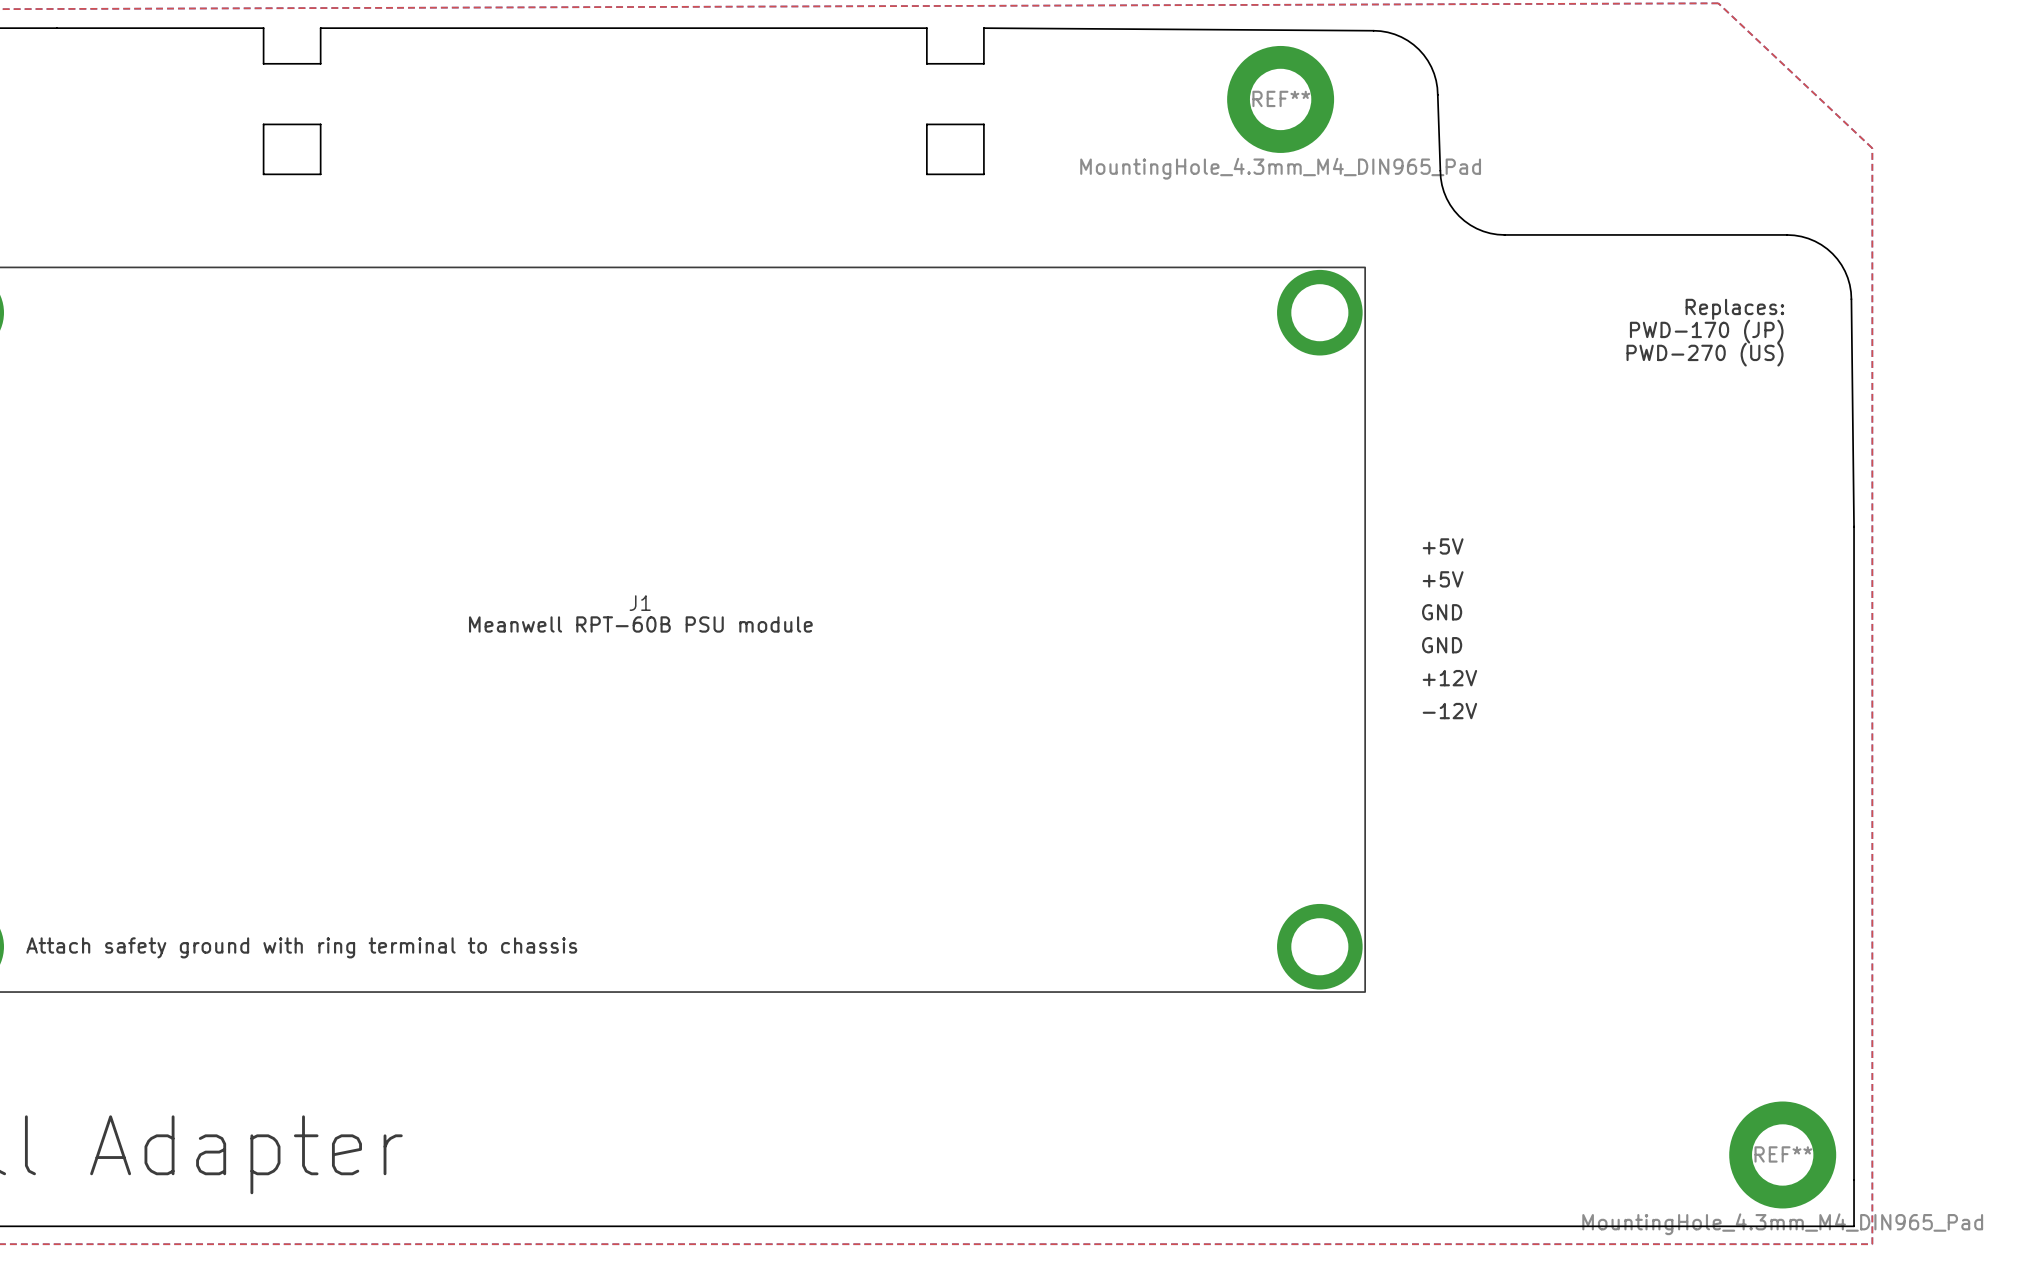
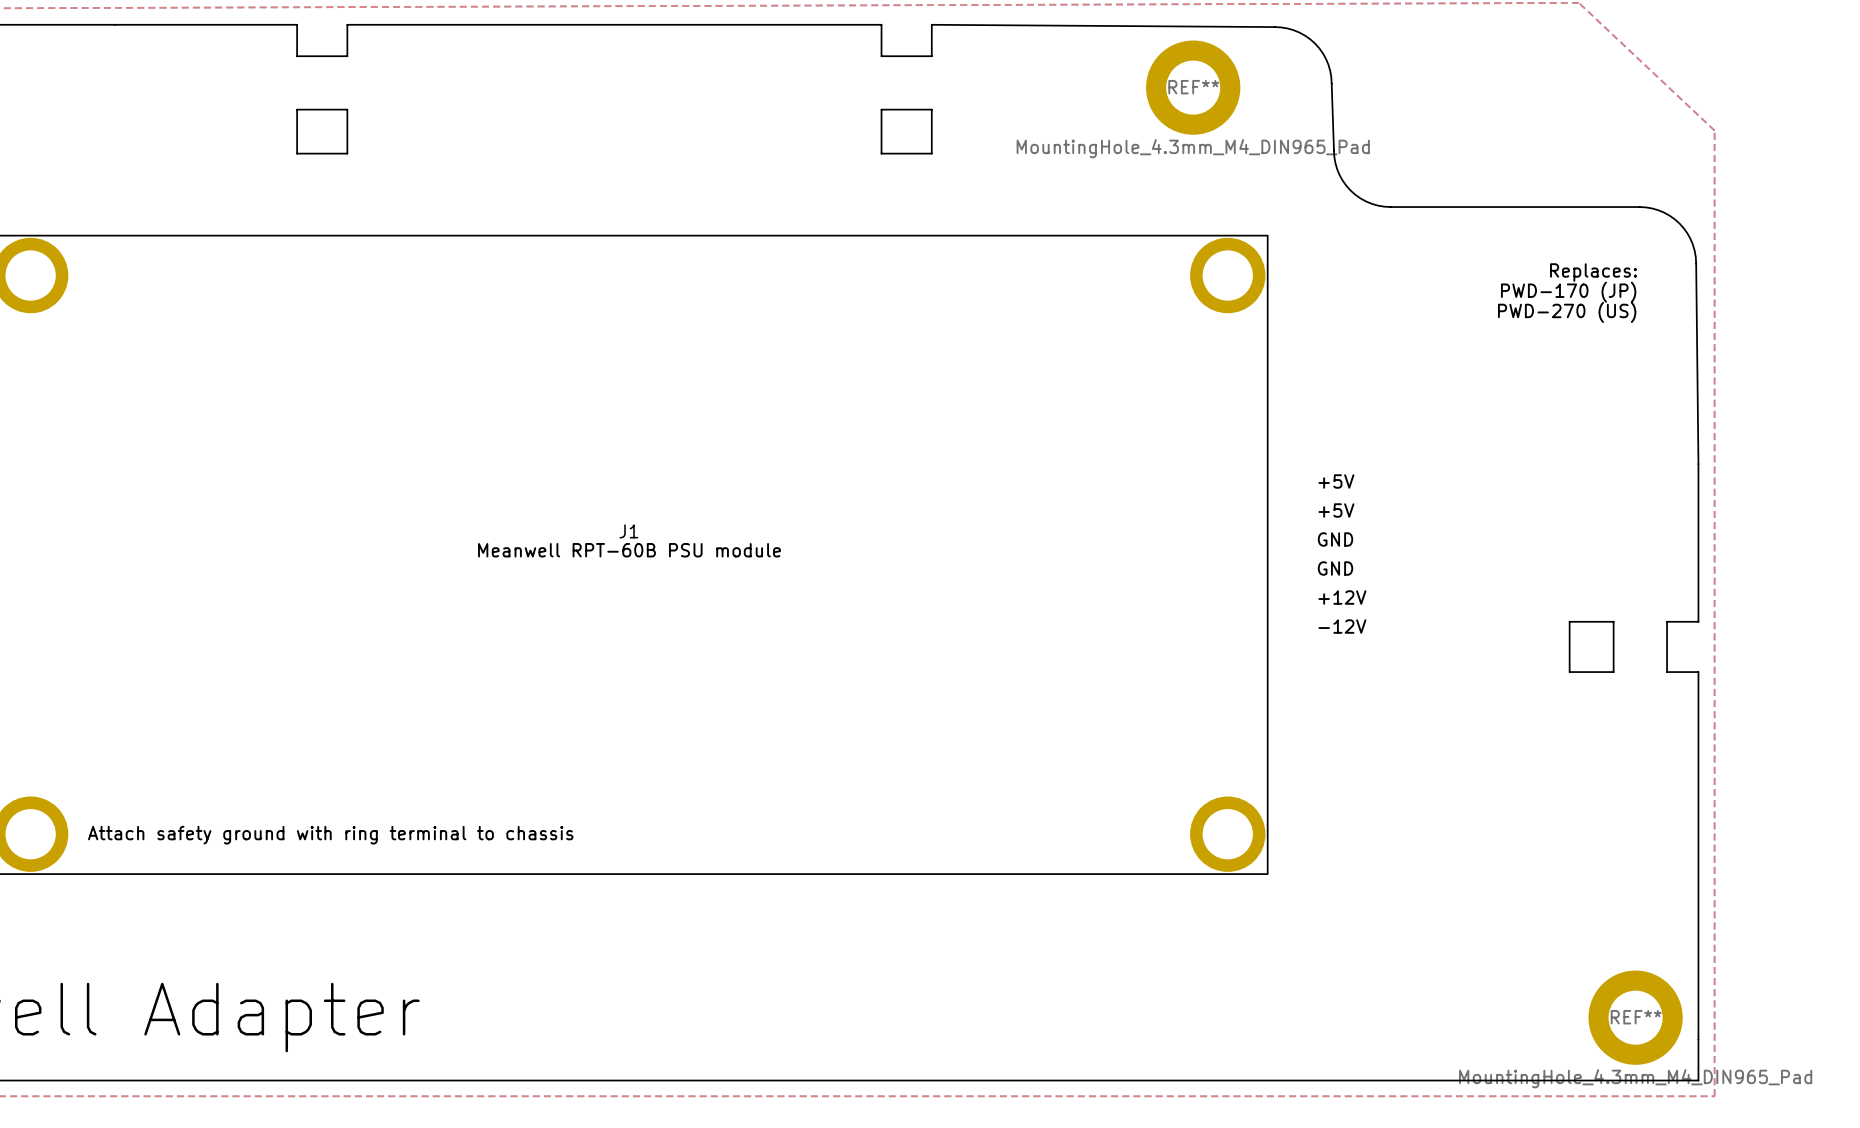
board edge: none -> (1569, 621) (1569, 672) (1613, 672) (1613, 621) (1569, 621)
board edge: (1854, 705) (1854, 762) -> (1698, 621) (1667, 621) (1667, 672) (1698, 672)

